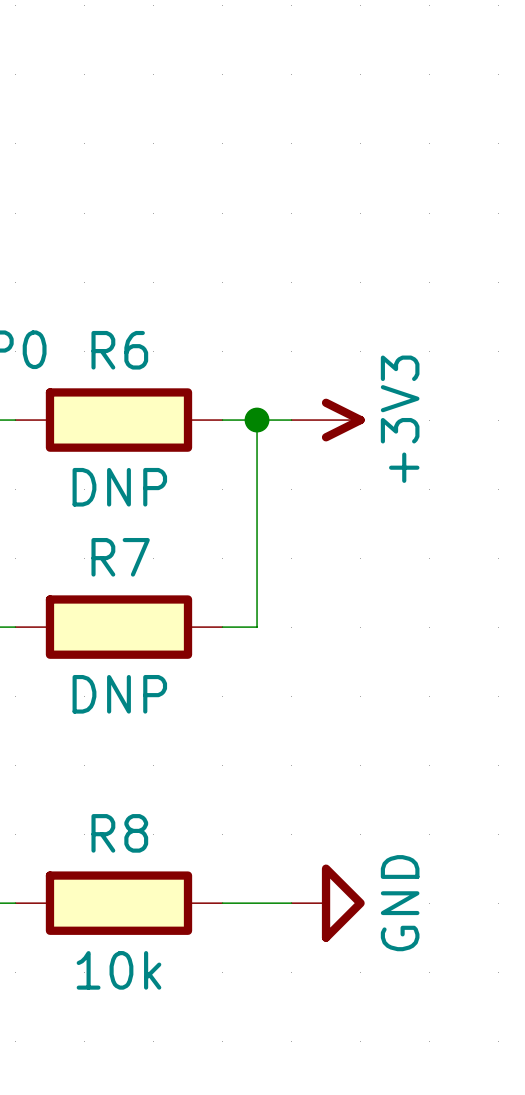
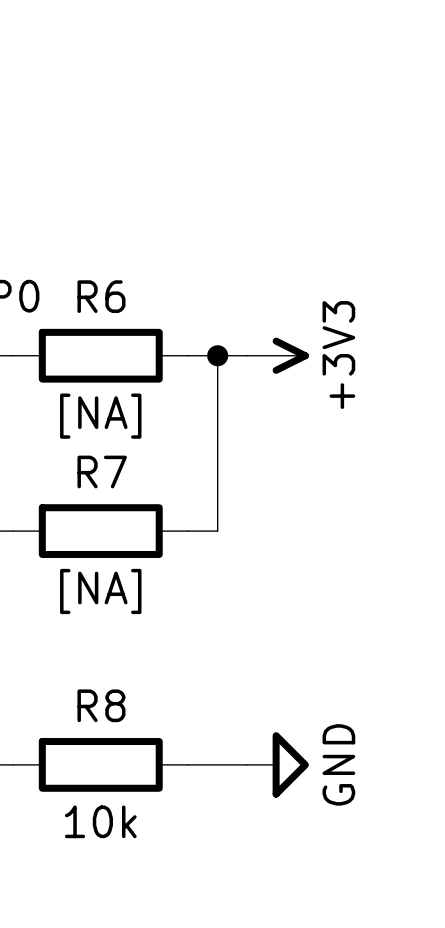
R6 value: DNP (119, 487) -> [NA] (100, 416)
R7 value: DNP (119, 694) -> [NA] (100, 591)

